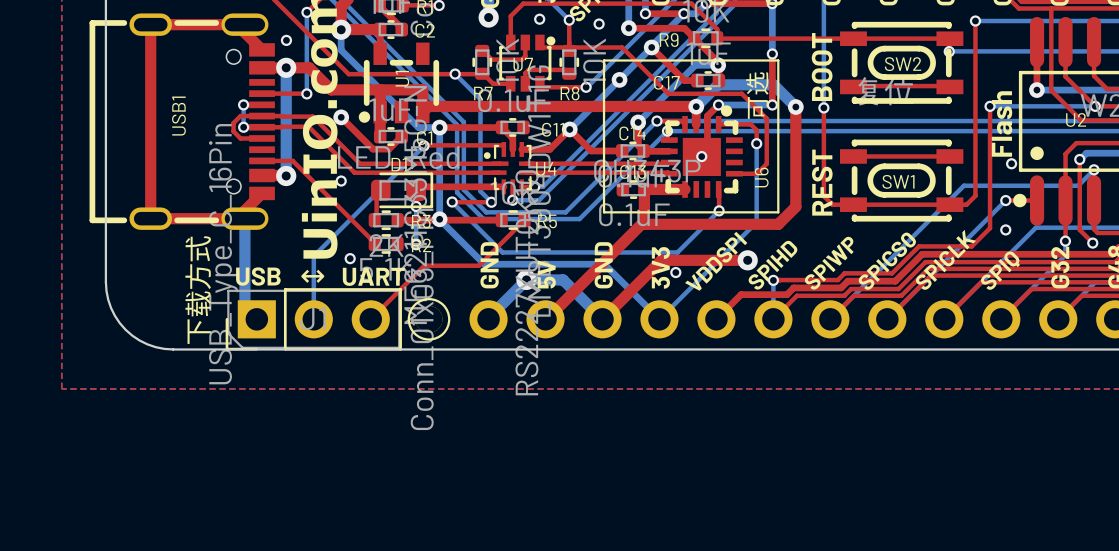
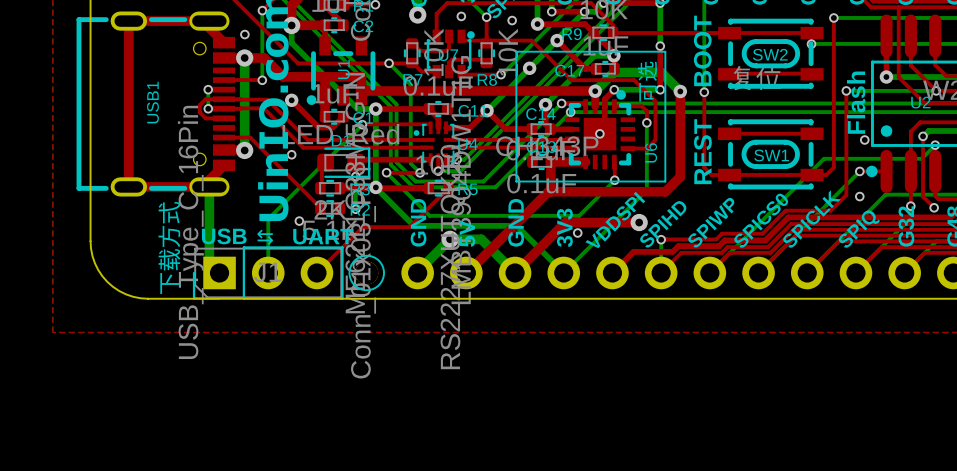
text: ↔ (312, 276) -> ⇆ (265, 237)

